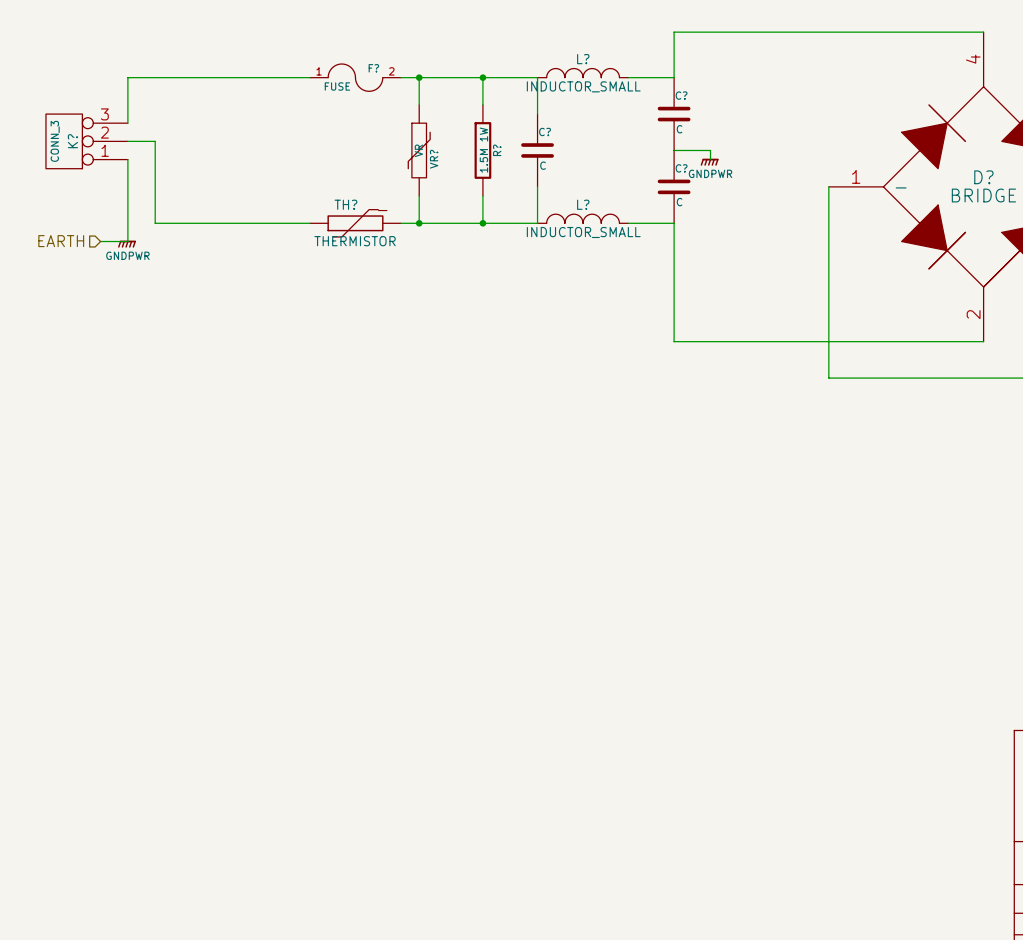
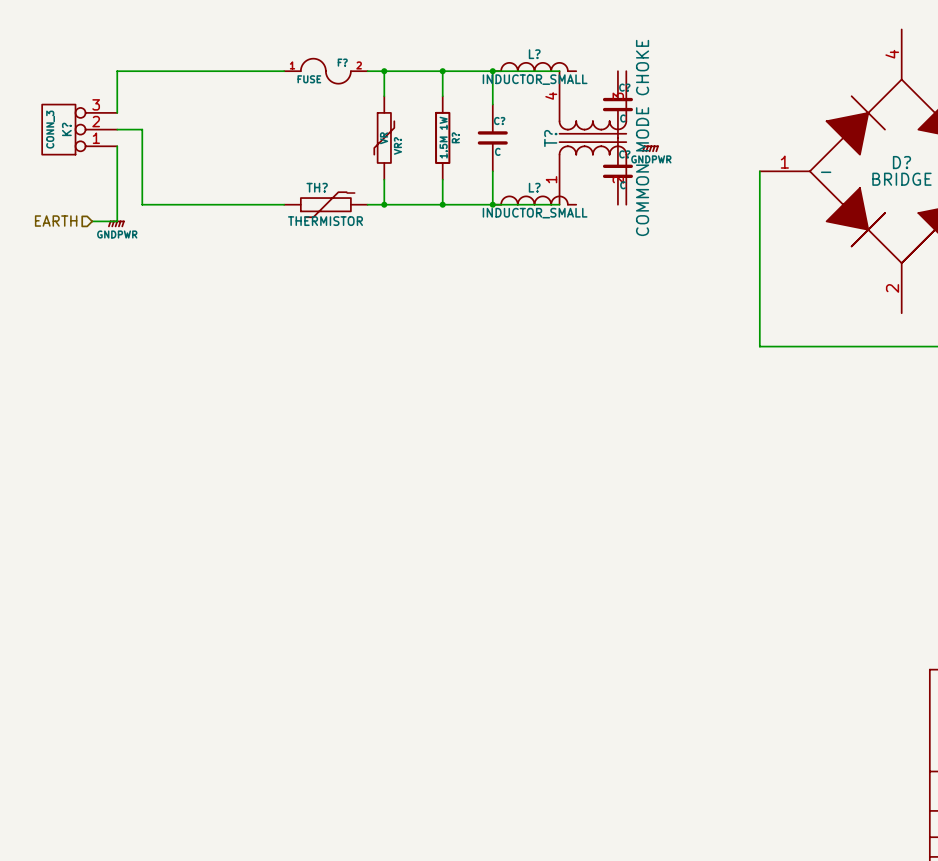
wire: (983, 32) (674, 32) (674, 77) (628, 77) -> none
wire: none -> (492, 71) (559, 71)
junction: none -> (492, 71)
T?: none -> COMMON MODE CHOKE (592, 137)
wire: (674, 150) (710, 150) (710, 159) -> none
wire: none -> (492, 204) (559, 204)
junction: none -> (492, 204)
wire: (628, 223) (674, 223) (674, 341) (983, 341) -> none

